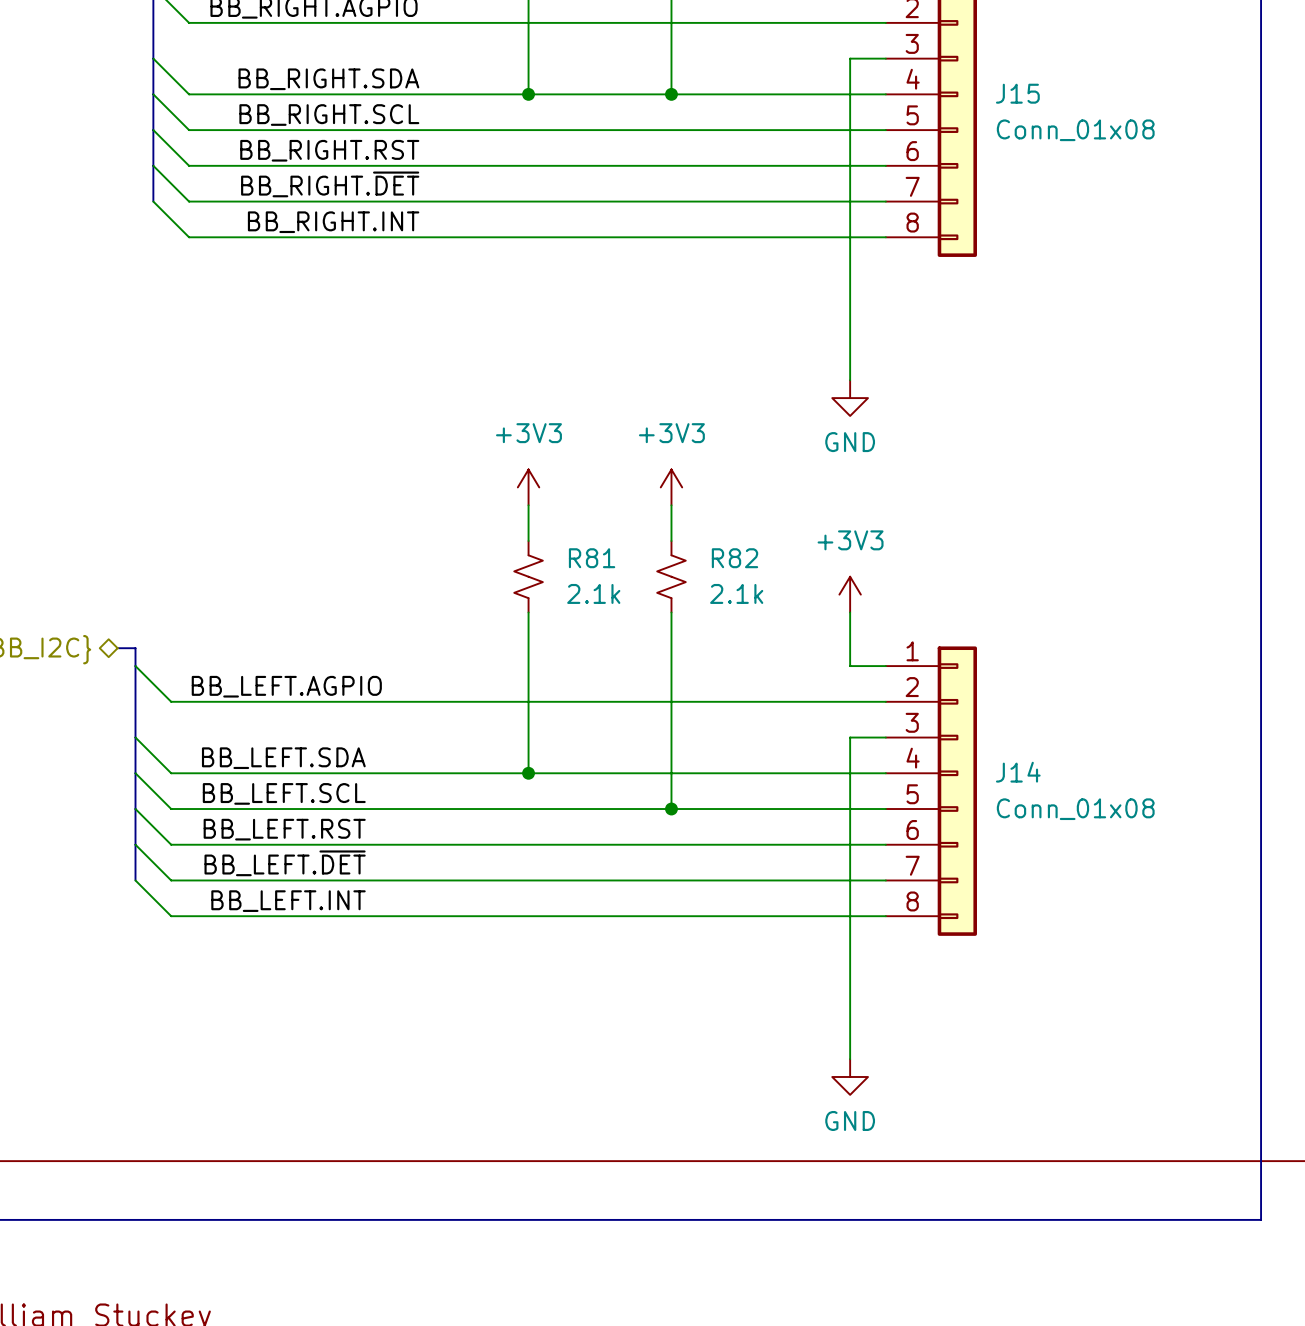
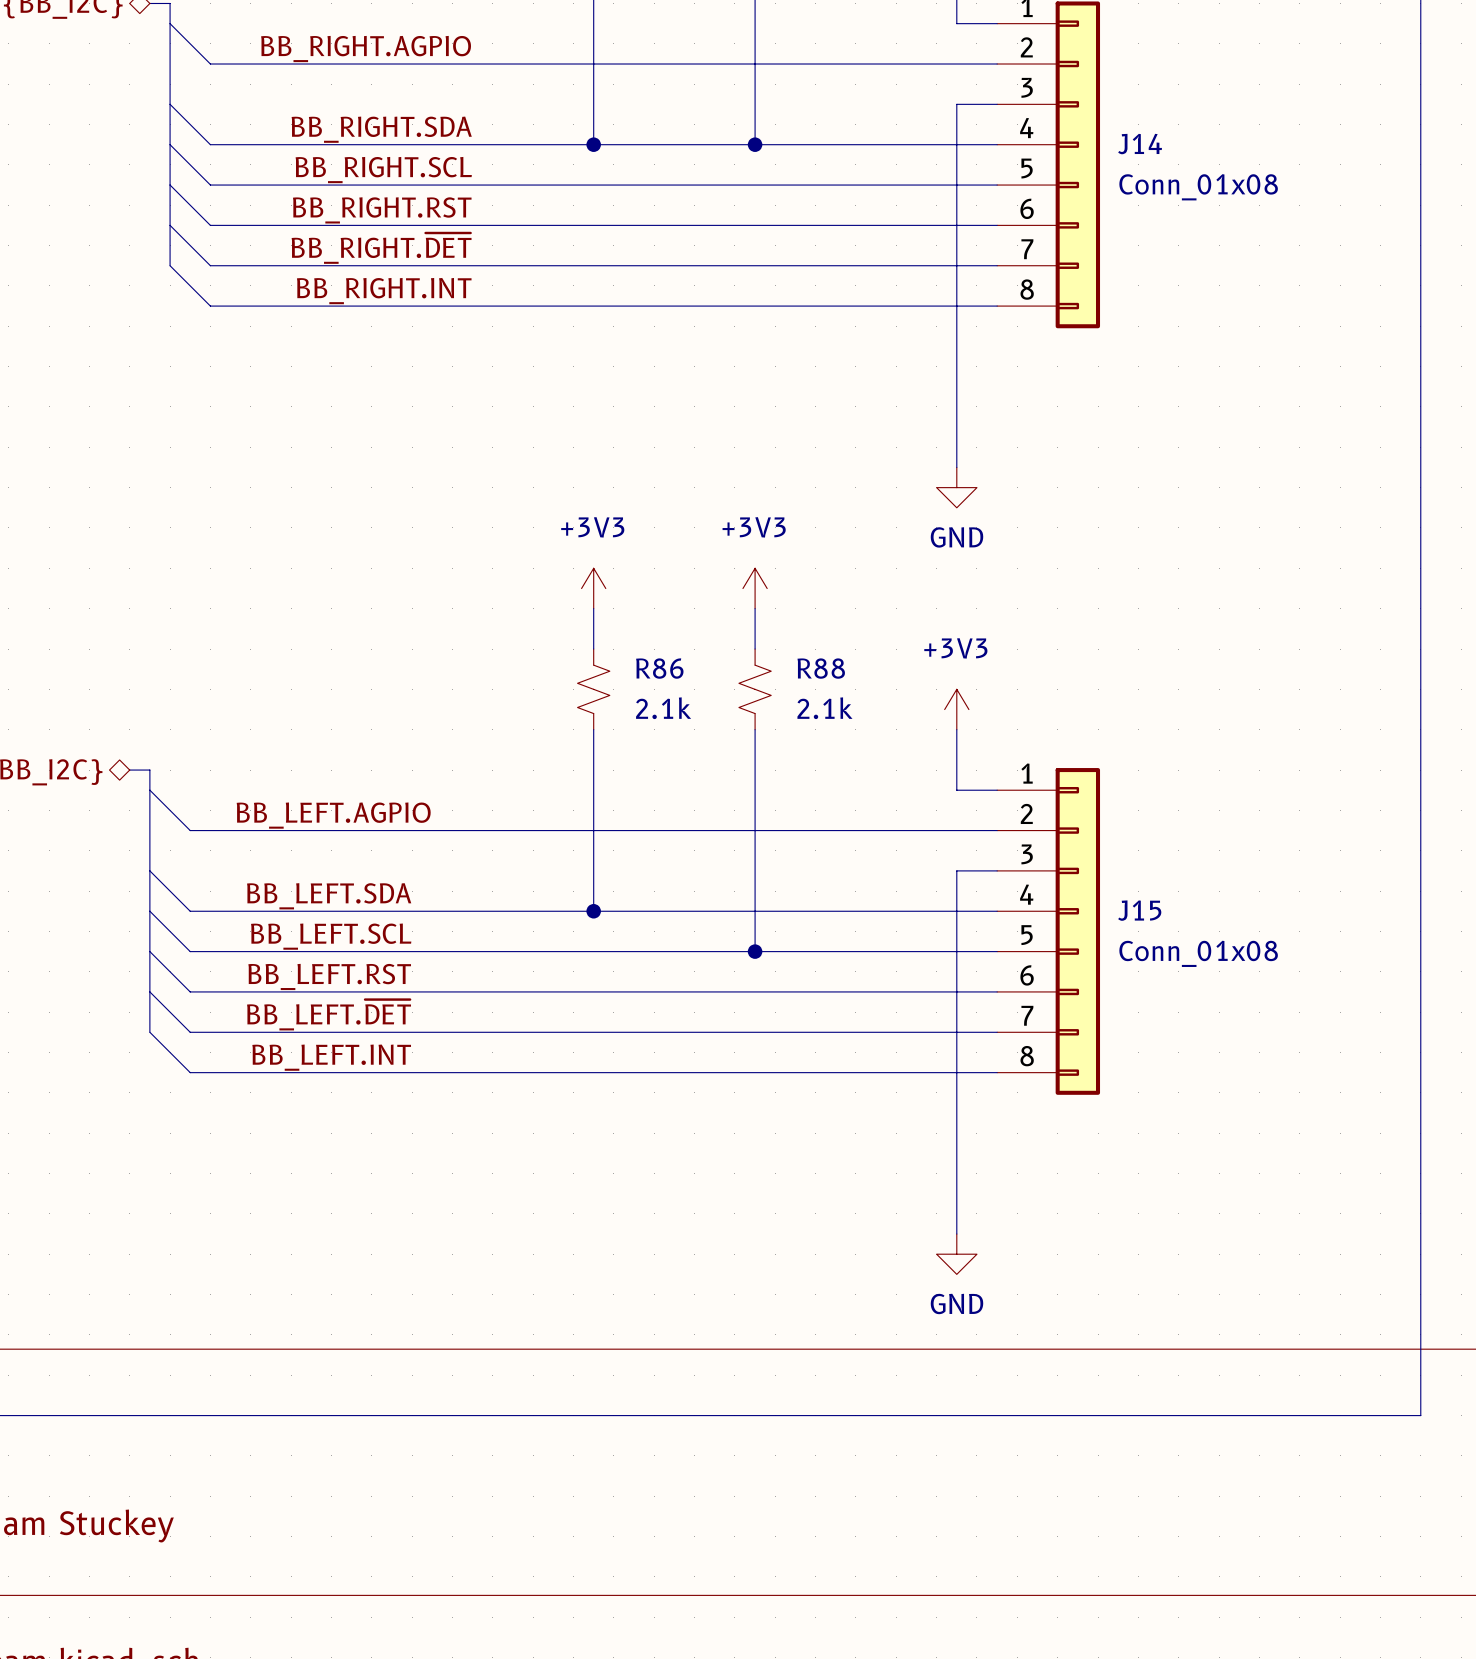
J15 name: J15 (1017, 93) -> J14 (1140, 144)
R81 name: R81 (592, 558) -> R86 (659, 668)
R82 name: R82 (734, 558) -> R88 (821, 668)
J14 name: J14 (1018, 772) -> J15 (1139, 910)

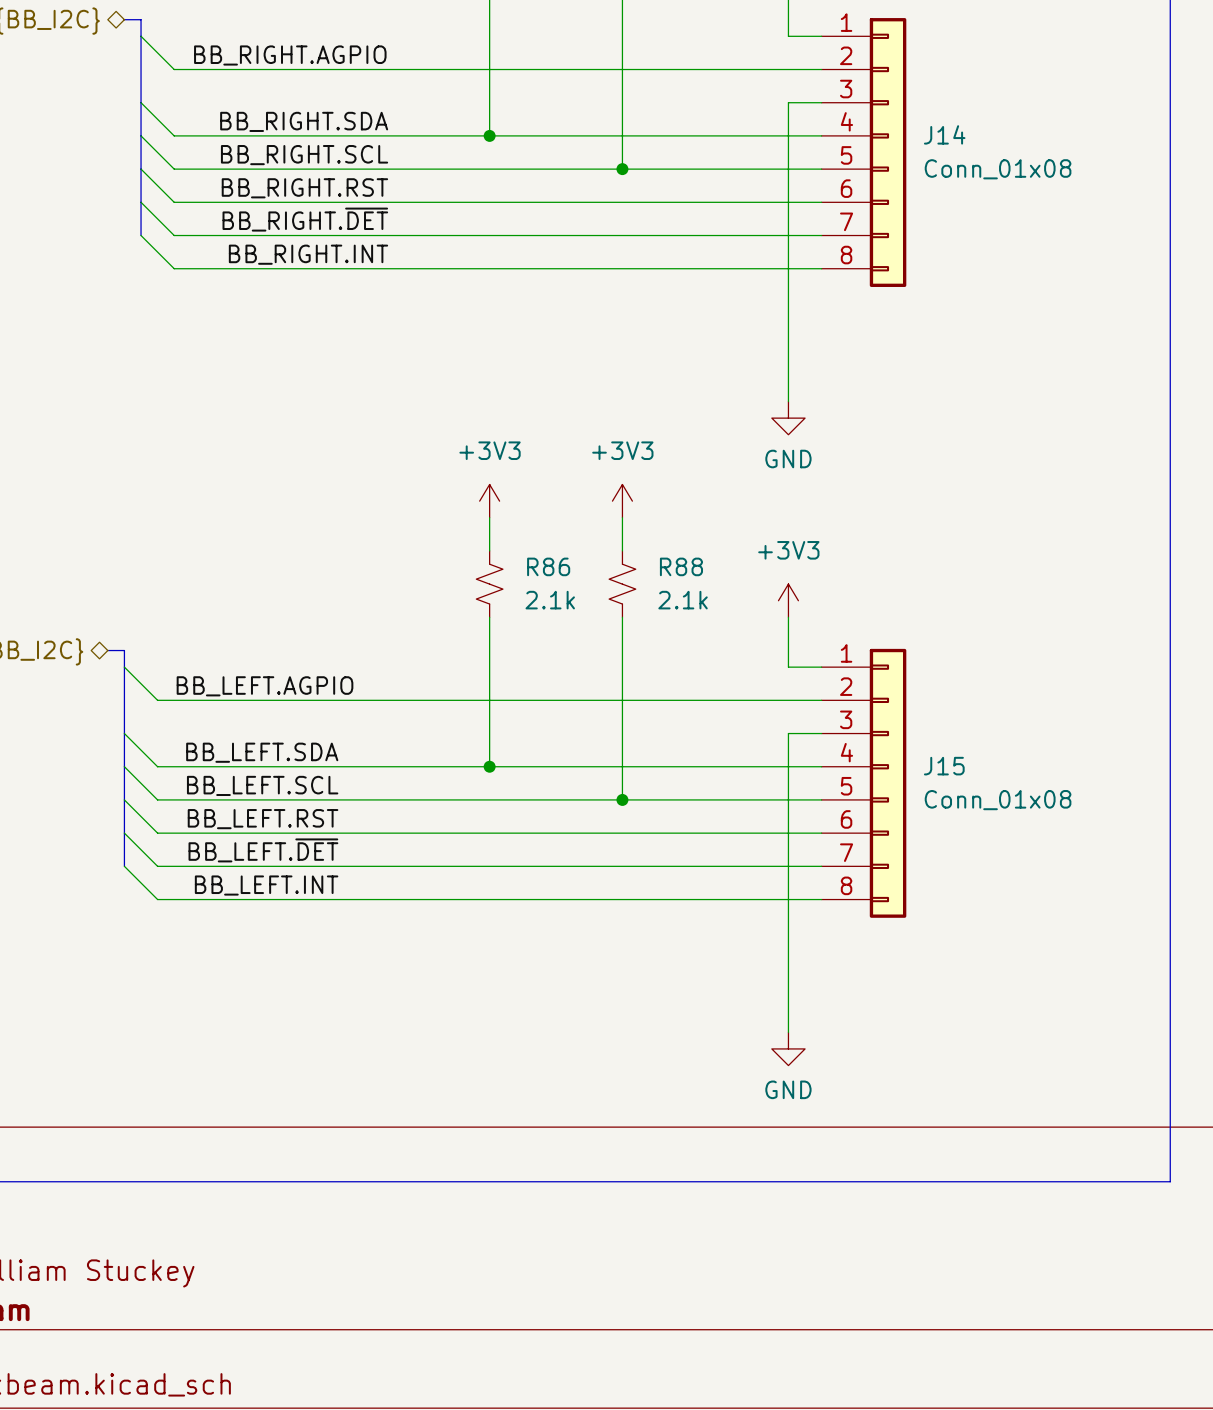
wire: none -> (622, 135) (622, 169)
junction position: (755, 144) -> (622, 169)

